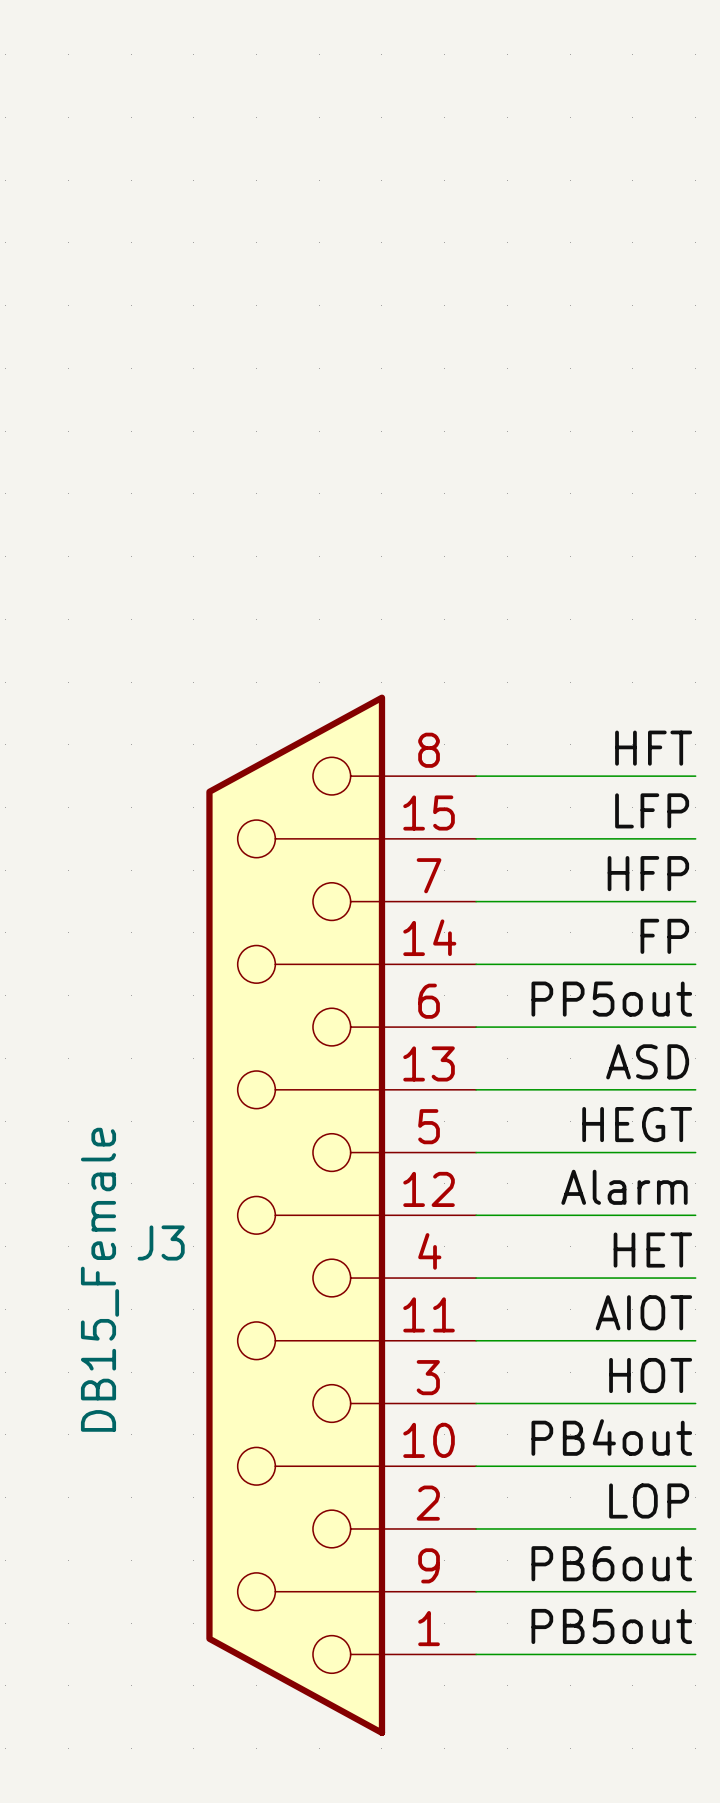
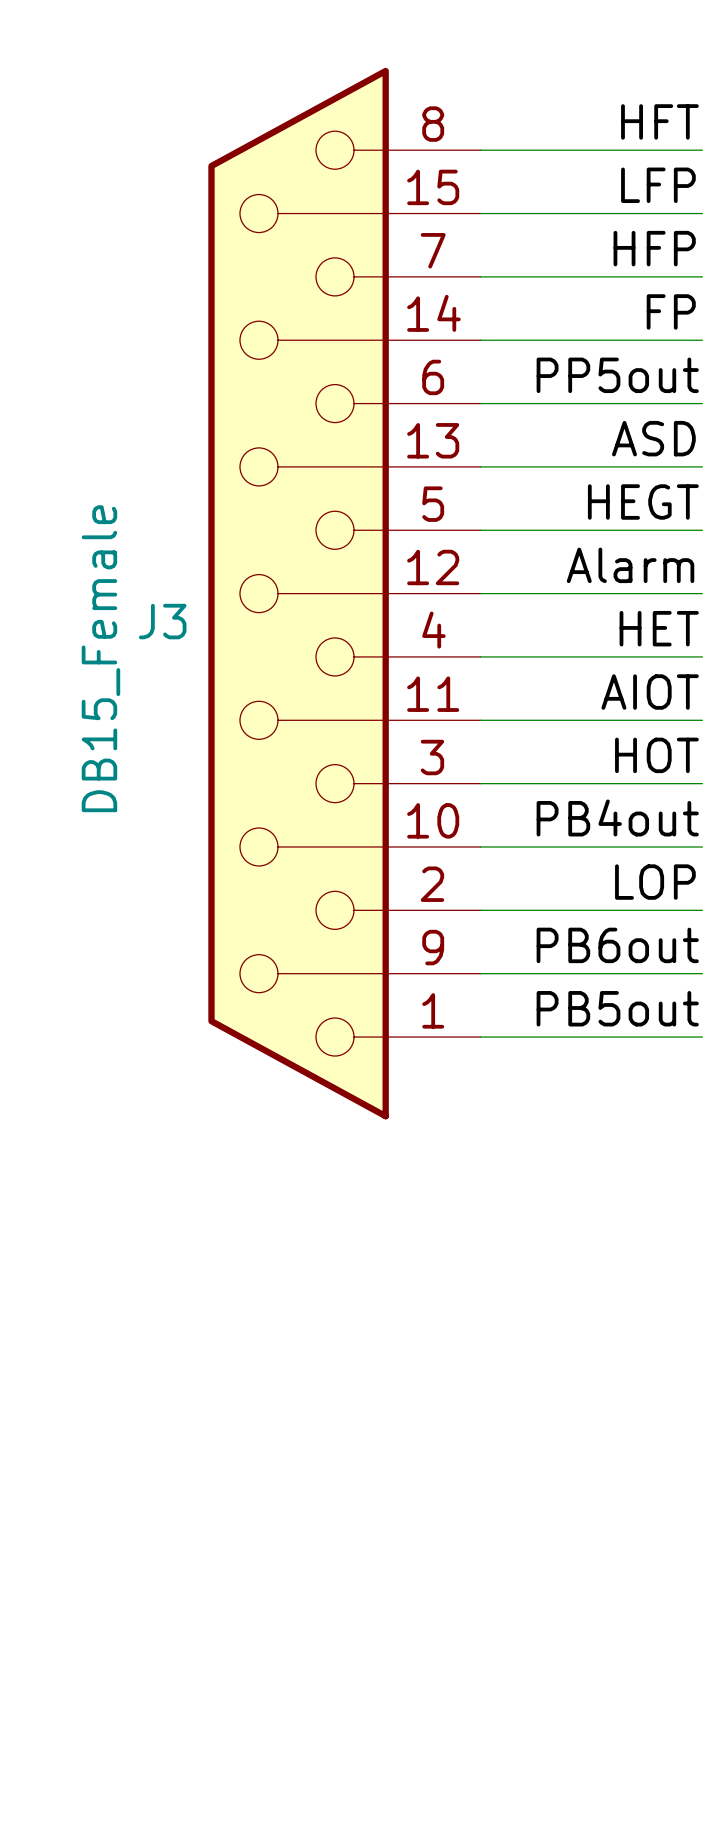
label: none -> HFT (659, 121)
wire: none -> (480, 150) (702, 150)
label: none -> LFP (658, 185)
wire: none -> (480, 213) (702, 213)
label: none -> HFP (654, 248)
wire: none -> (480, 276) (702, 276)
label: none -> FP (671, 311)
wire: none -> (480, 340) (702, 340)
label: none -> PP5out (617, 375)
wire: none -> (480, 403) (702, 403)
label: none -> ASD (653, 438)
wire: none -> (480, 466) (702, 466)
label: none -> HEGT (643, 502)
label: none -> Alarm (630, 565)
label: none -> HET (659, 628)
label: none -> AIOT (650, 692)
label: HFT (653, 748) -> HOT (656, 755)
label: LFP (652, 810) -> PB4out (617, 817)
label: HFP (648, 873) -> LOP (655, 882)
label: FP (664, 936) -> PB6out (617, 945)
label: PP5out (611, 999) -> PB5out (617, 1008)
label: ASD (647, 1061) -> none
wire: (476, 1089) (695, 1089) -> (480, 530) (702, 530)
label: HEGT (637, 1124) -> none
wire: (476, 1152) (695, 1152) -> (480, 593) (702, 593)
label: Alarm (624, 1187) -> none
J3 position: (341, 1215) -> (344, 593)
wire: (476, 1215) (695, 1215) -> (480, 656) (702, 656)
label: HET (652, 1250) -> none
wire: (476, 1278) (695, 1278) -> (480, 720) (702, 720)
label: AIOT (643, 1312) -> none
wire: (476, 1340) (695, 1340) -> none
label: HOT (650, 1375) -> none
wire: (476, 1403) (695, 1403) -> none
label: PB4out (611, 1437) -> none
wire: (476, 1466) (695, 1466) -> none
label: LOP (649, 1500) -> none
wire: (476, 1528) (695, 1528) -> none
label: PB6out (611, 1563) -> none
wire: (476, 1591) (695, 1591) -> none
label: PB5out (611, 1626) -> none
wire: (476, 1654) (695, 1654) -> none

